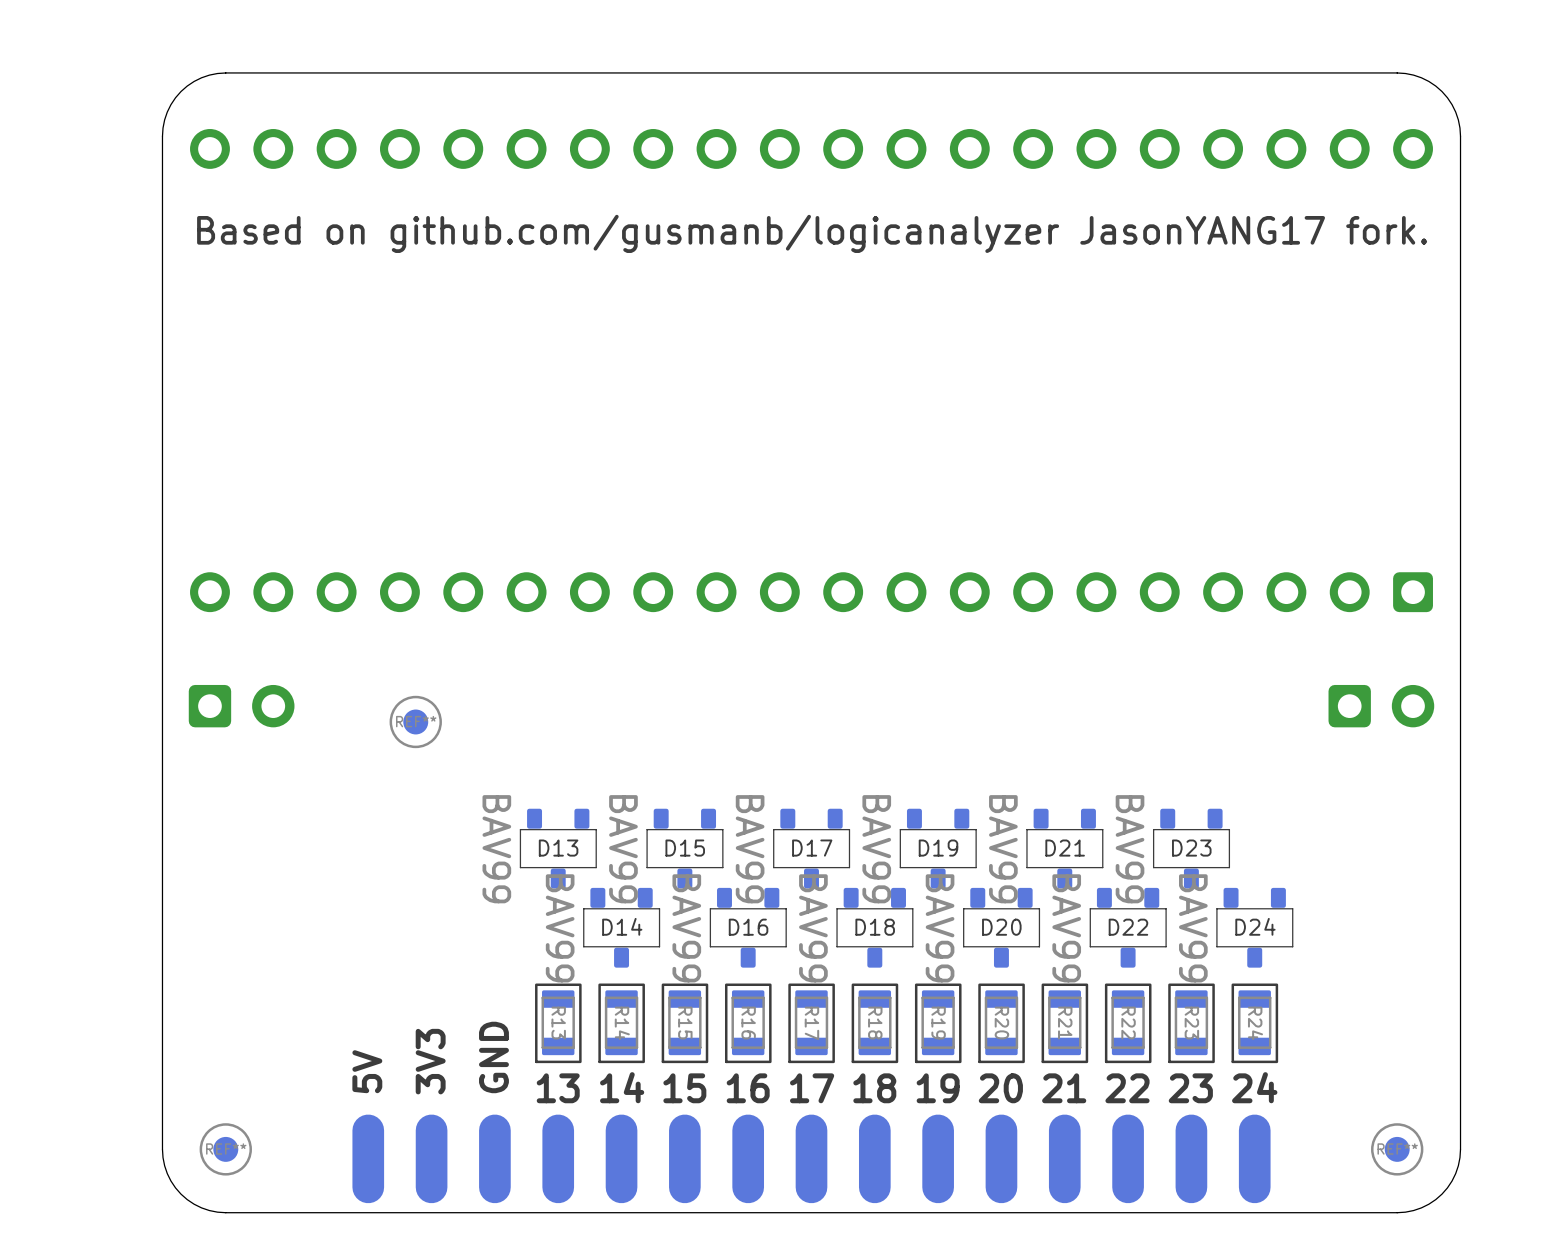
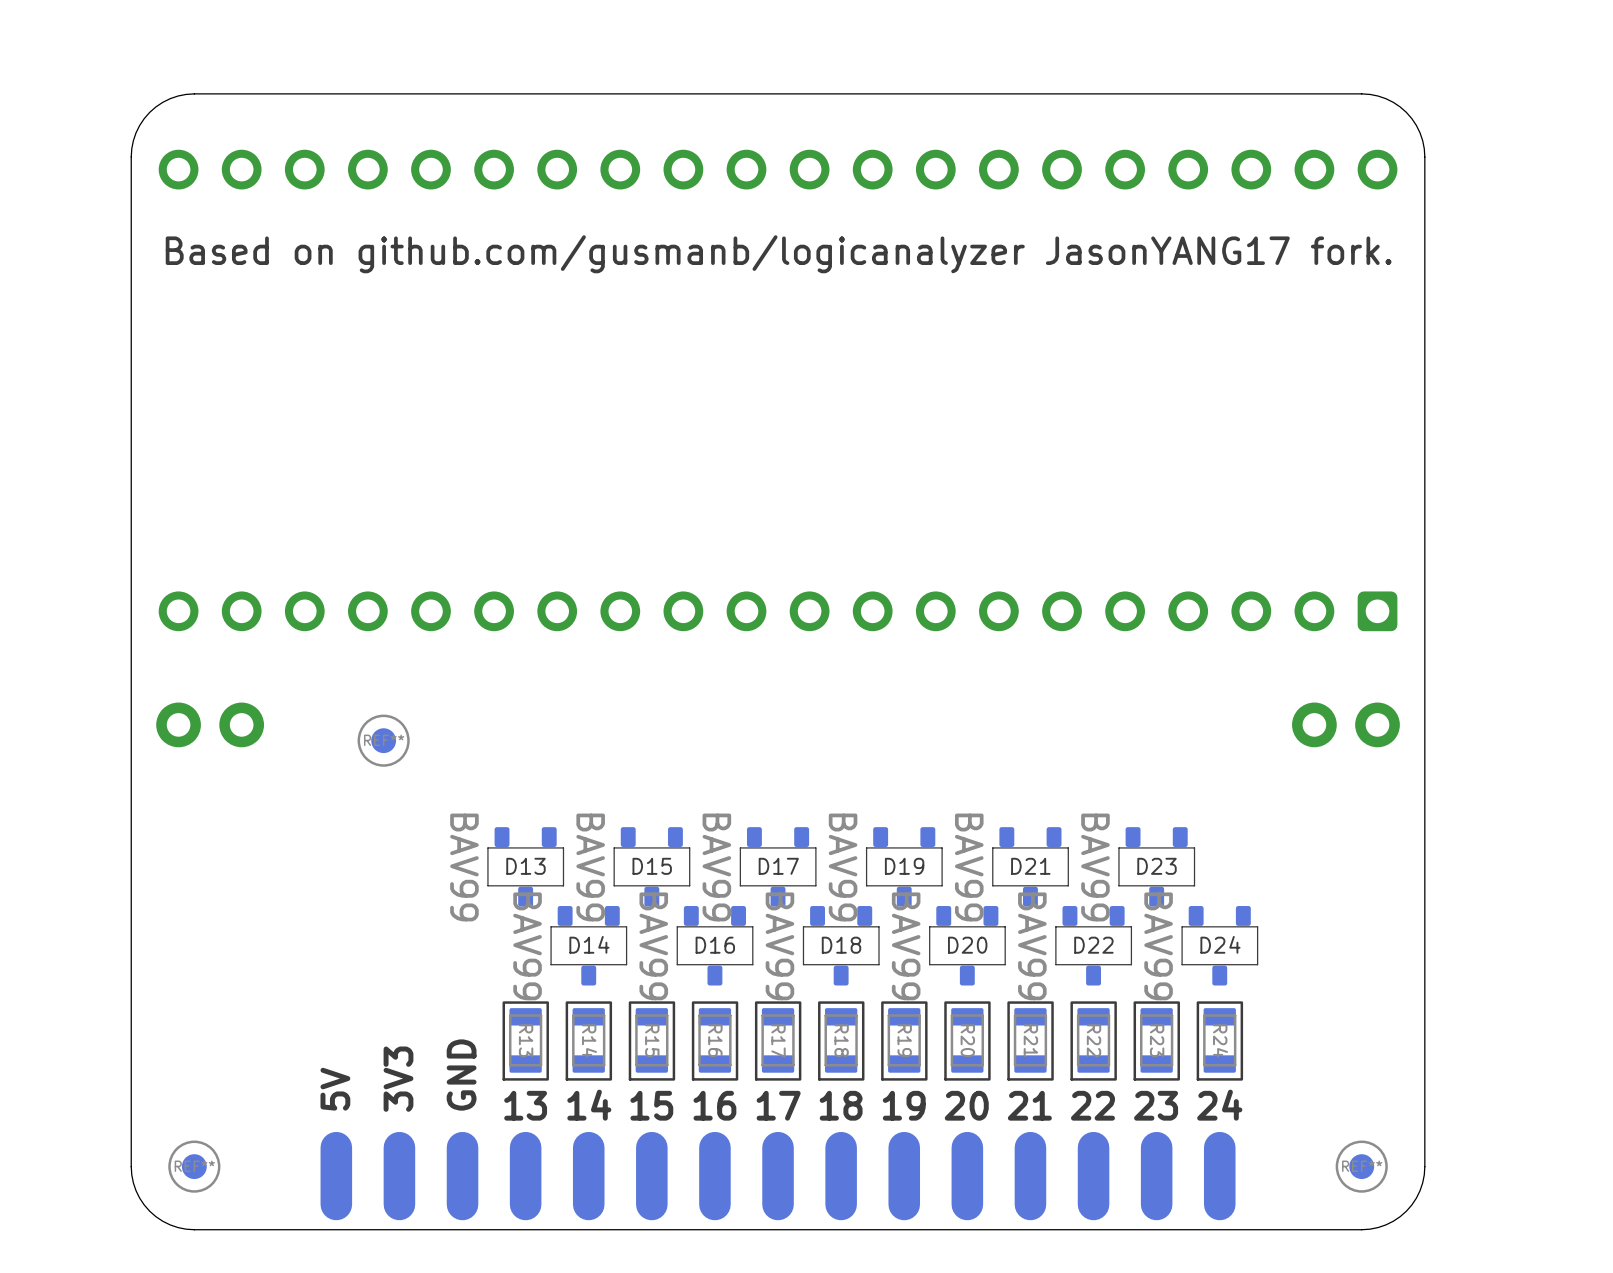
part footprint: [188, 684, 295, 728] -> [156, 702, 265, 748]
part footprint: [1328, 684, 1435, 728] -> [1292, 702, 1400, 748]

